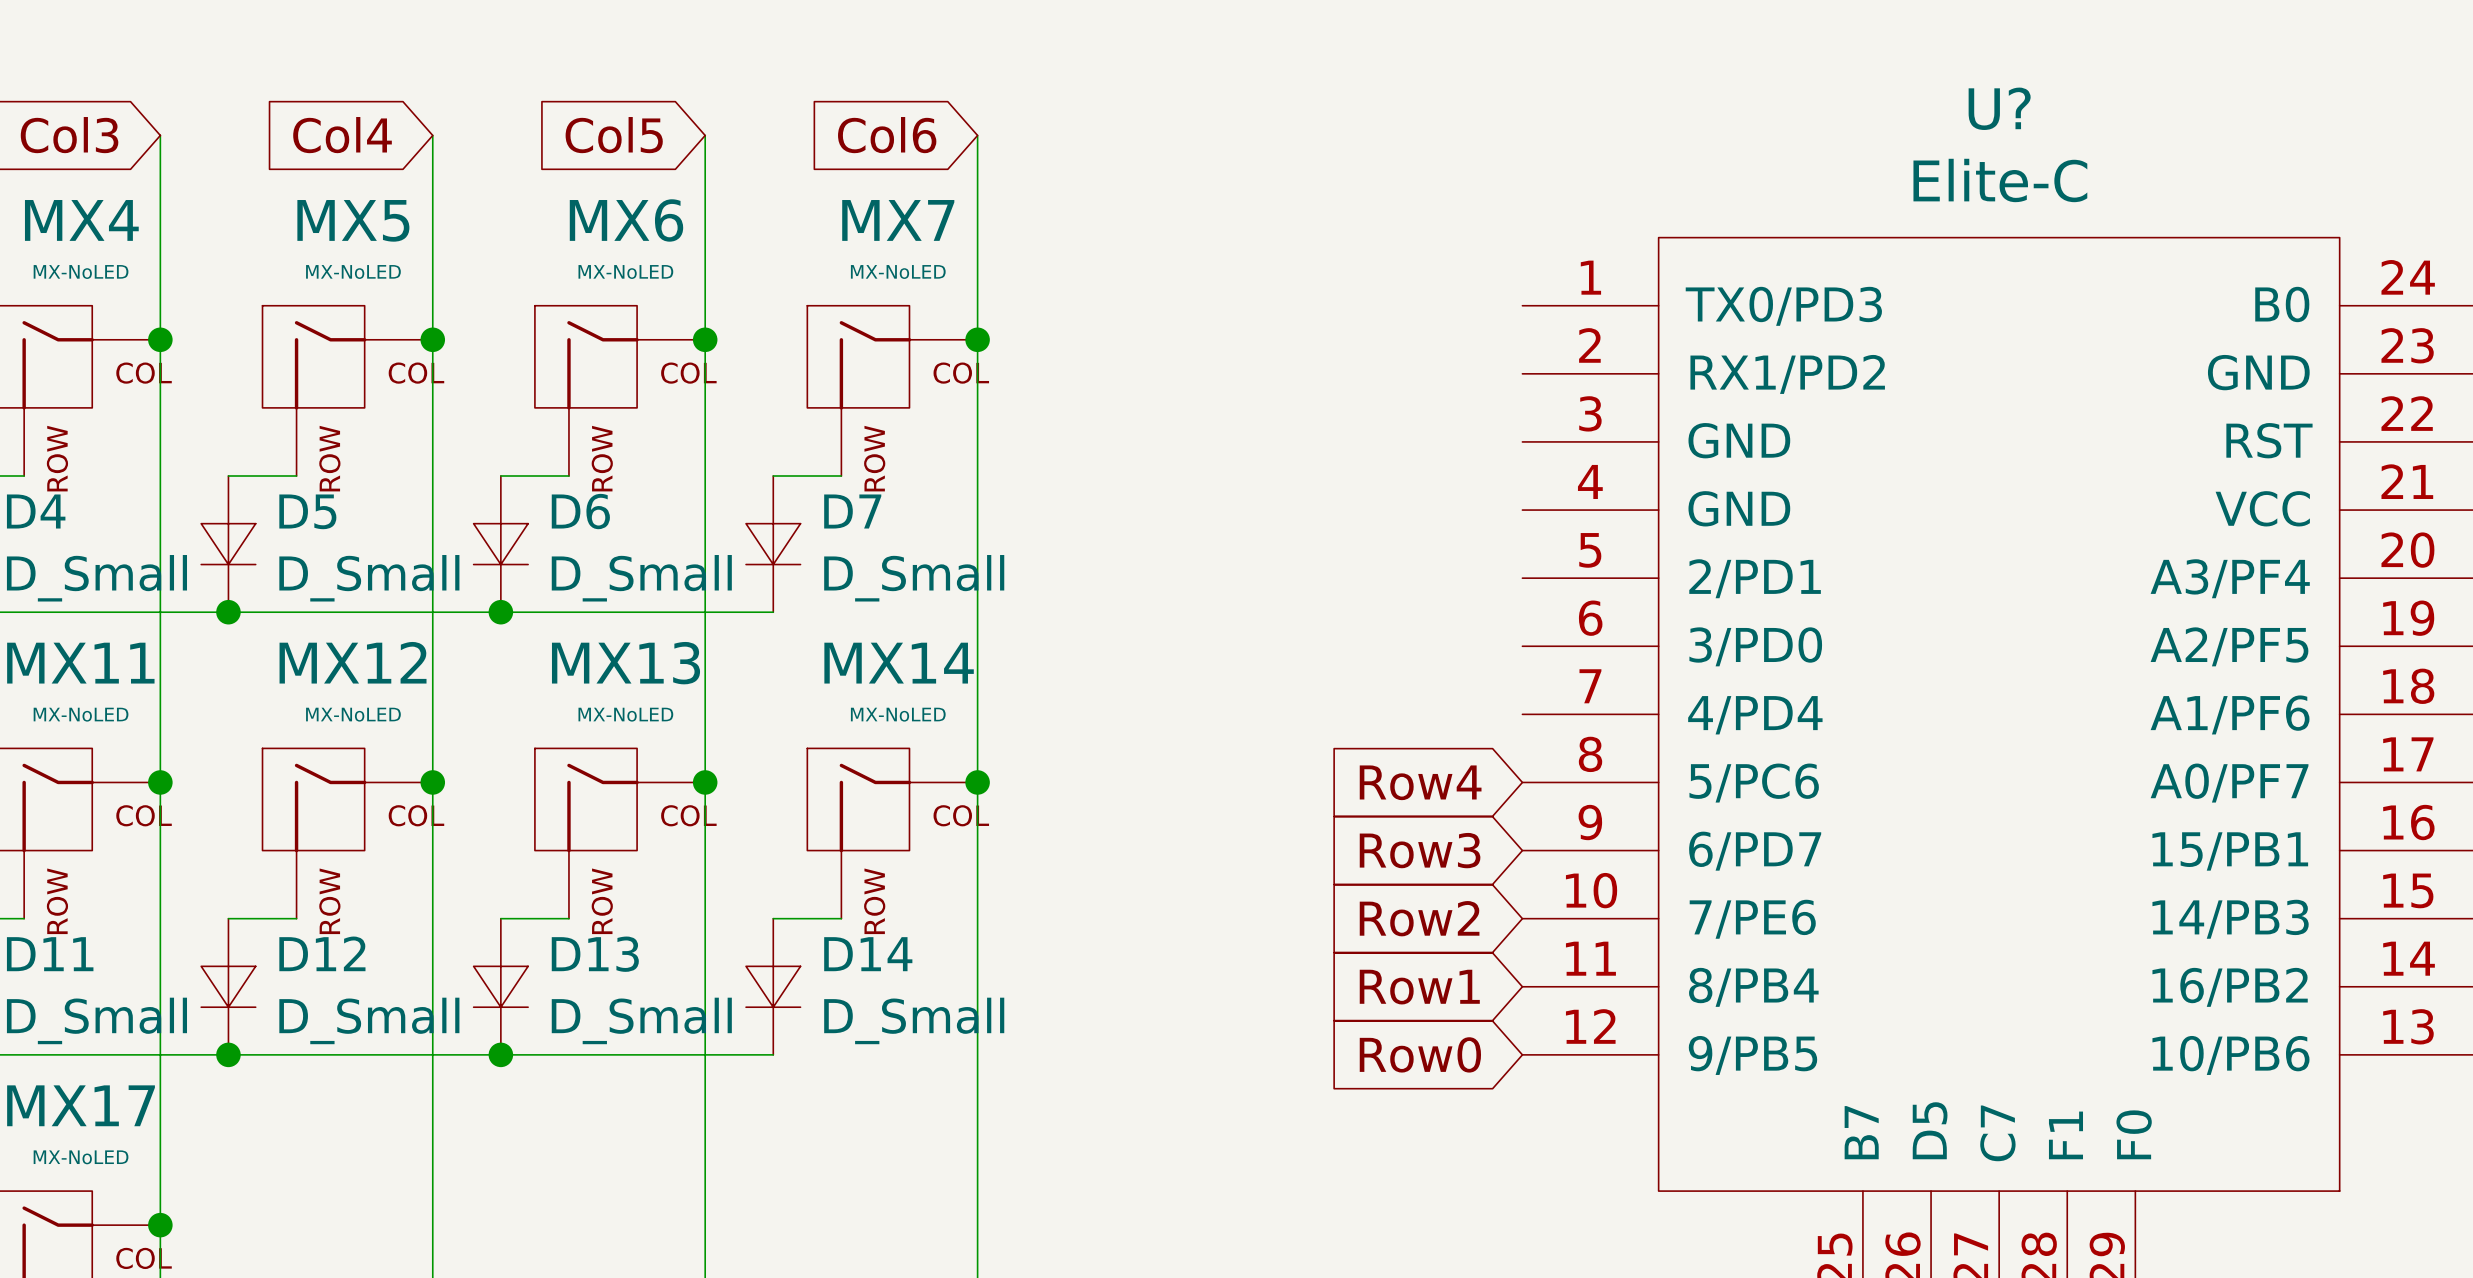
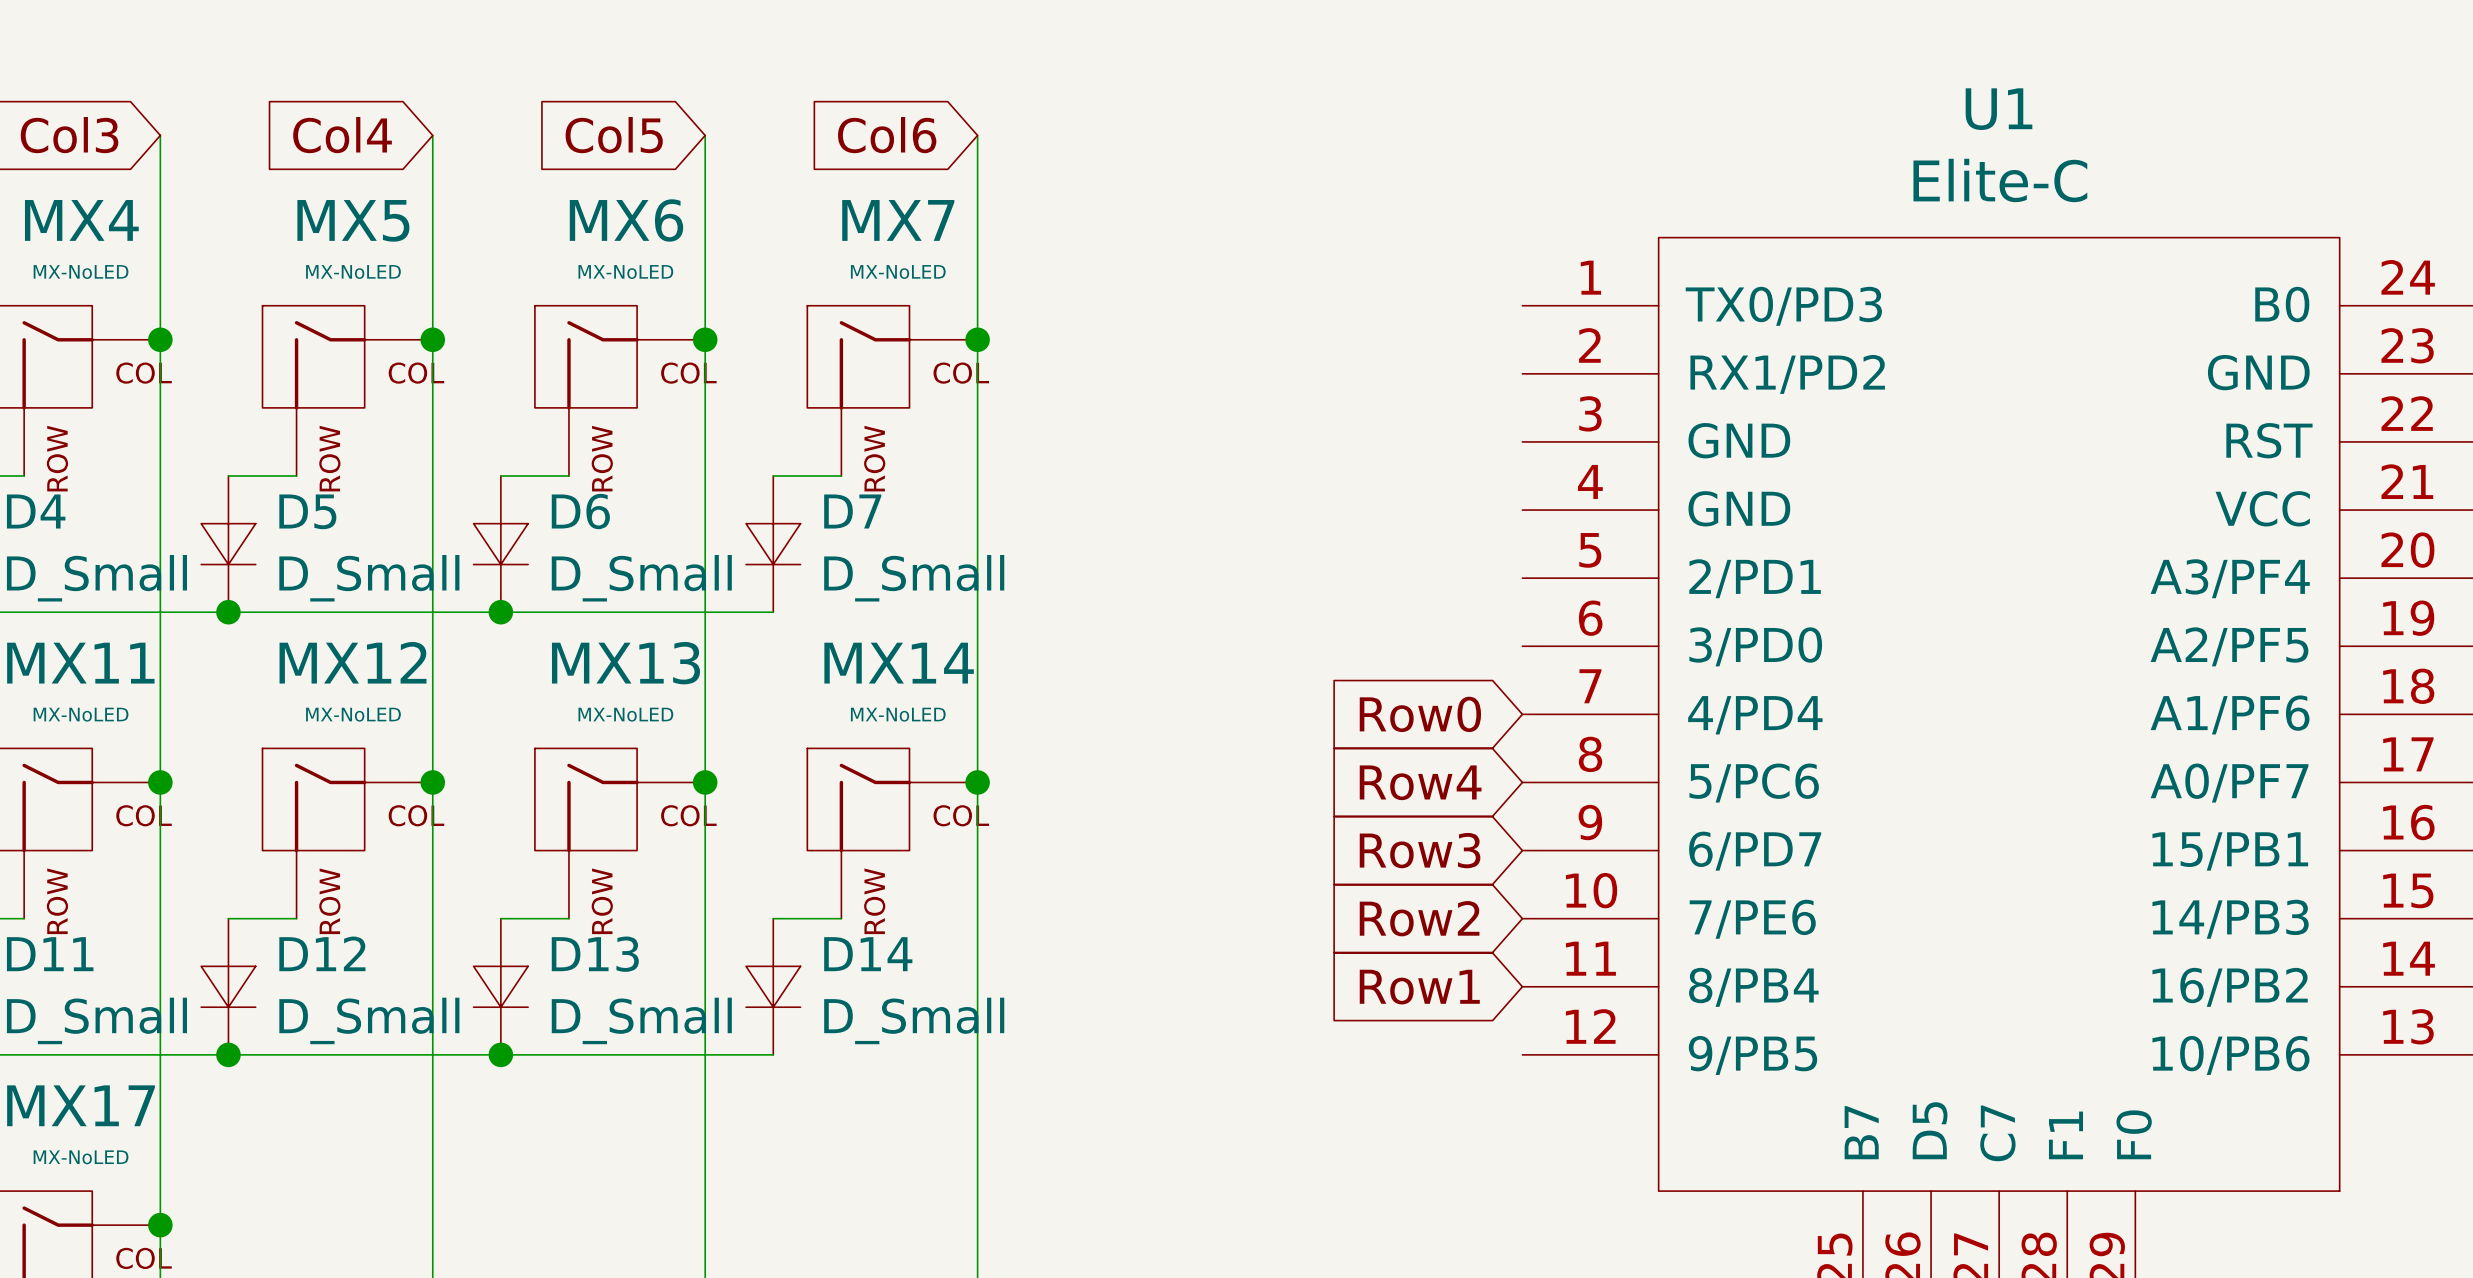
U? name: U? (1999, 108) -> U1 (1998, 109)
global label position: Row0 (1420, 1054) -> Row0 (1420, 714)

